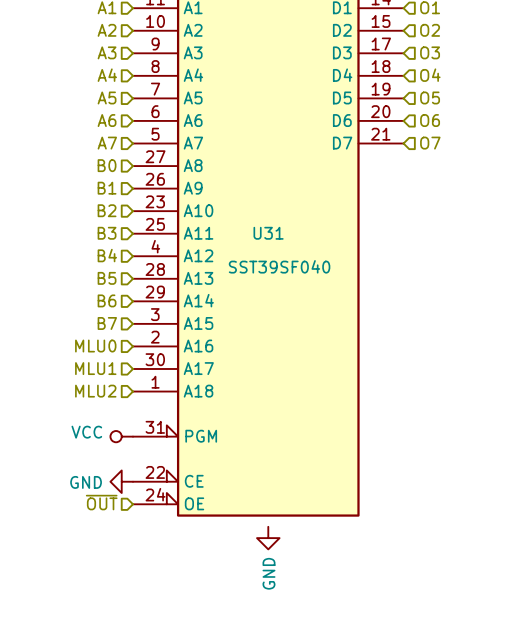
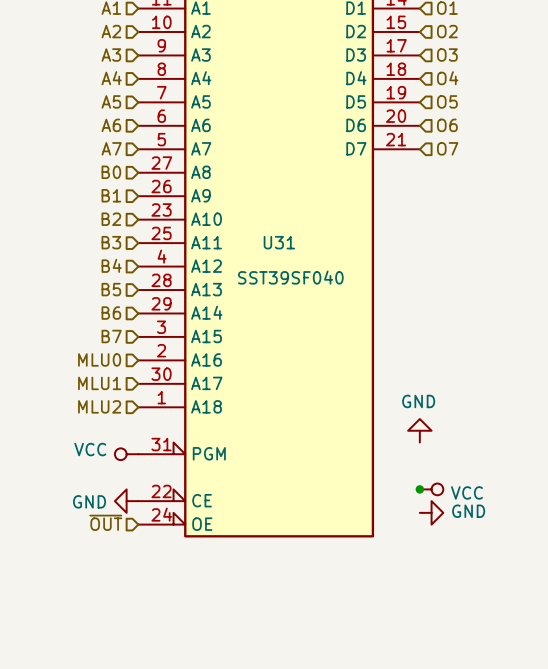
power symbol: none -> GND (419, 430)
junction: none -> (419, 489)
power symbol: none -> VCC (431, 489)
power symbol: none -> GND (431, 512)
power symbol: GND (268, 538) -> none

